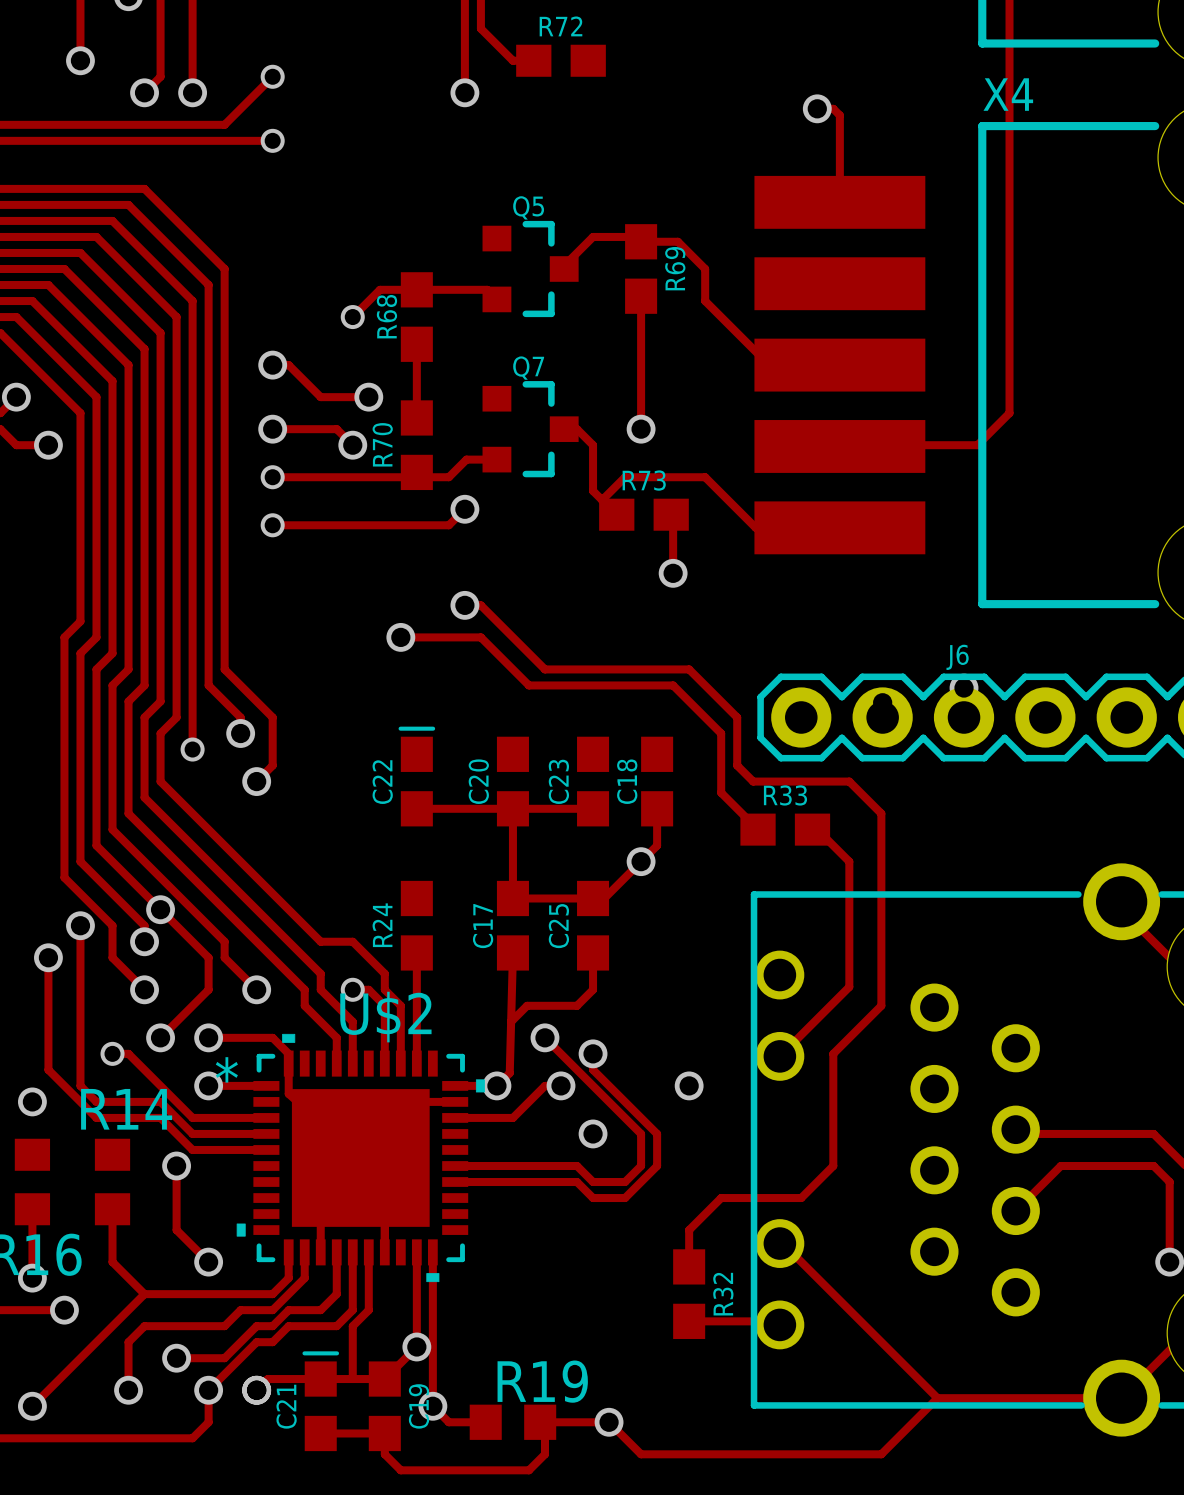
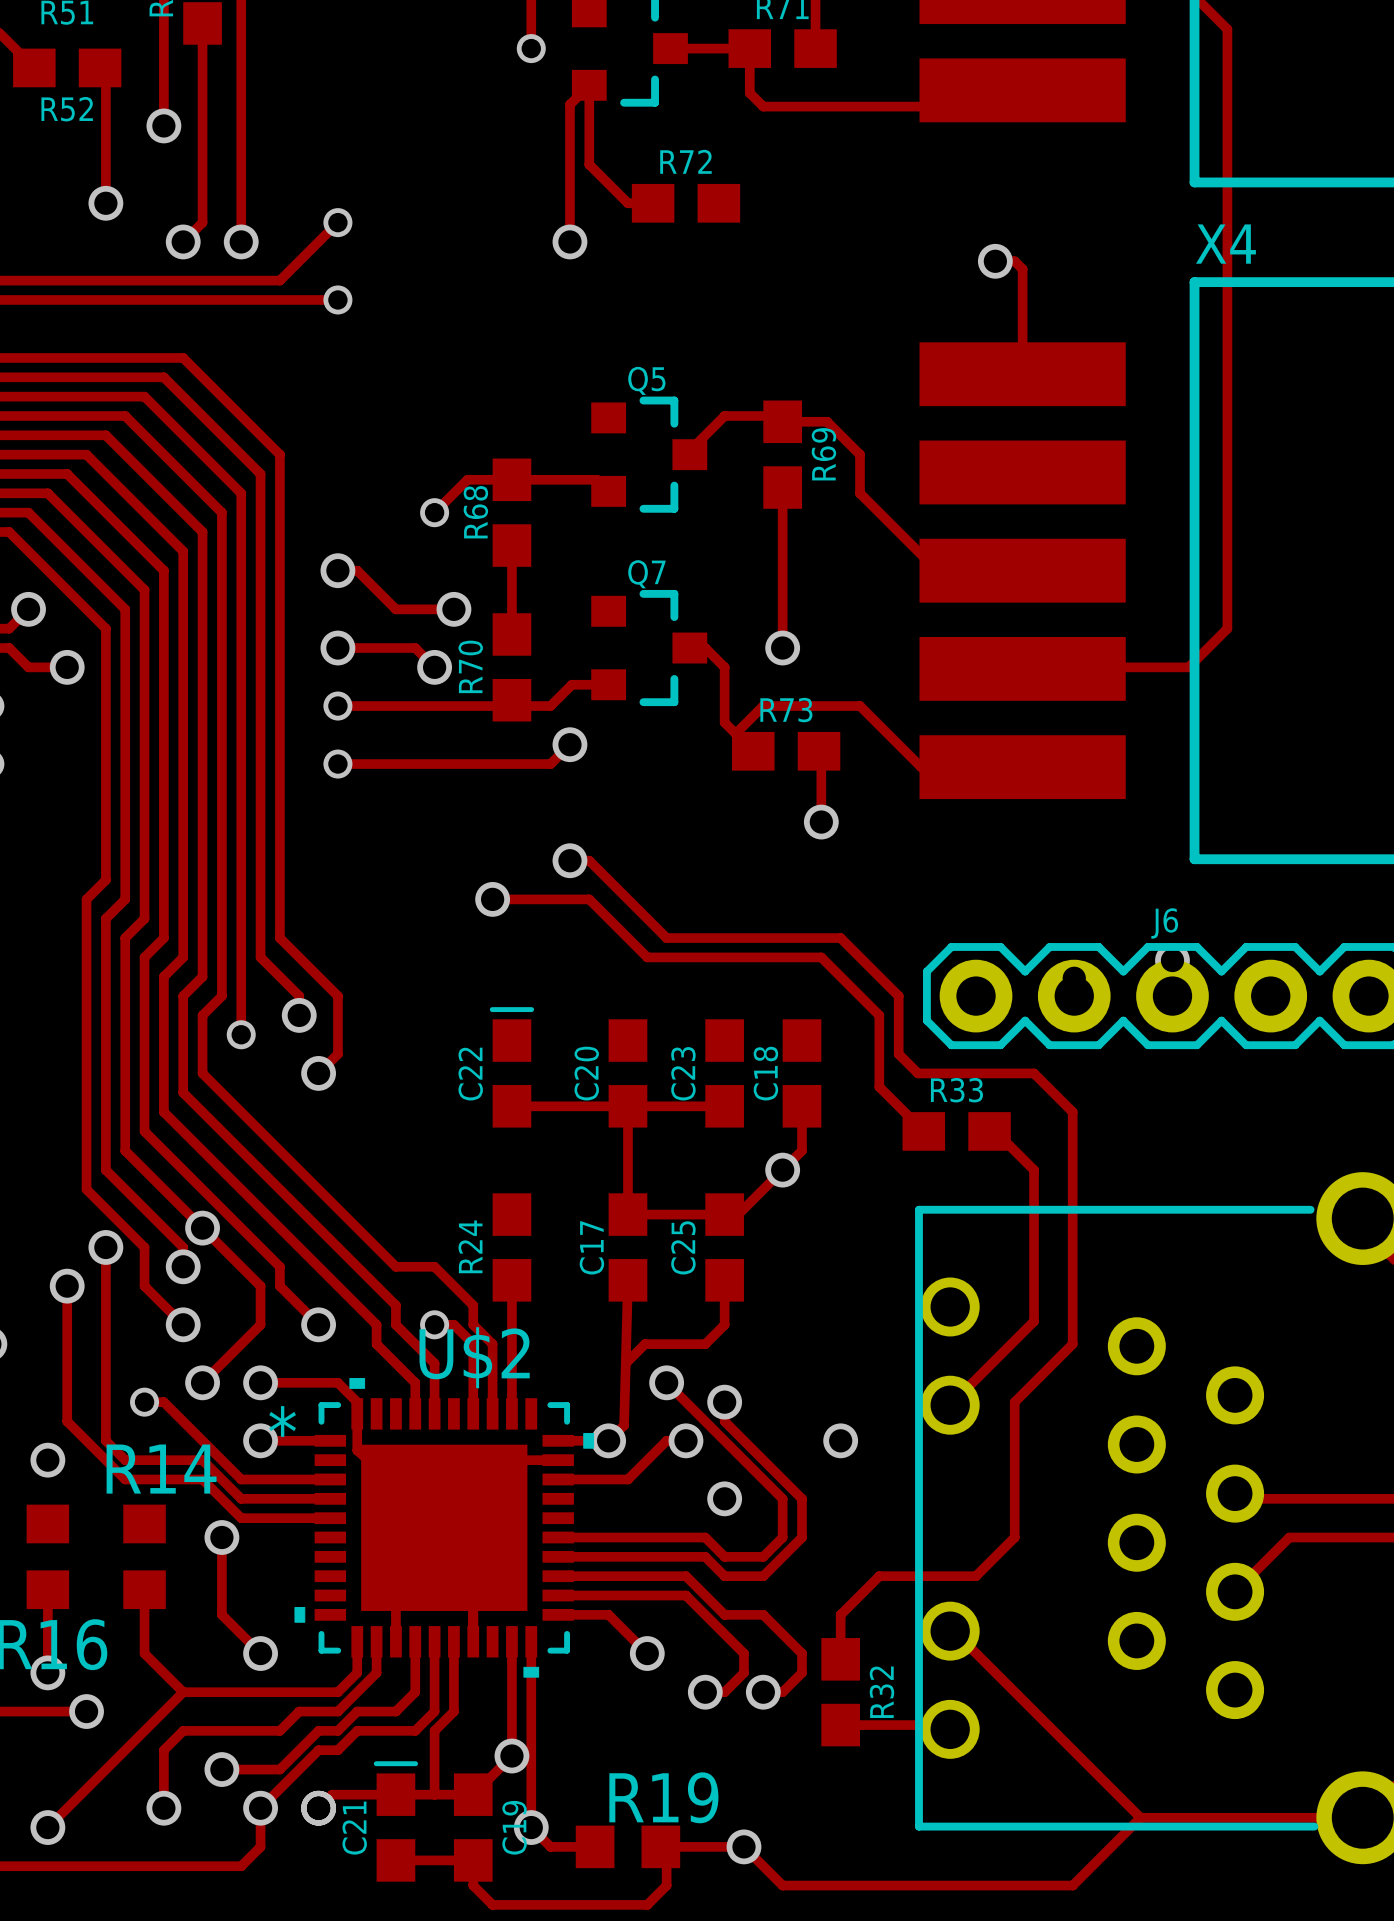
track: none -> (558, 1576) (685, 1576) (724, 1614) (763, 1614) (802, 1653) (802, 1672) (782, 1692) (763, 1692)
track: none -> (558, 1595) (685, 1595) (743, 1653) (743, 1672) (724, 1692) (705, 1692)
track: none -> (558, 1614) (608, 1614) (647, 1653)
via: none -> (647, 1653)
via: none -> (705, 1692)
via: none -> (763, 1692)

